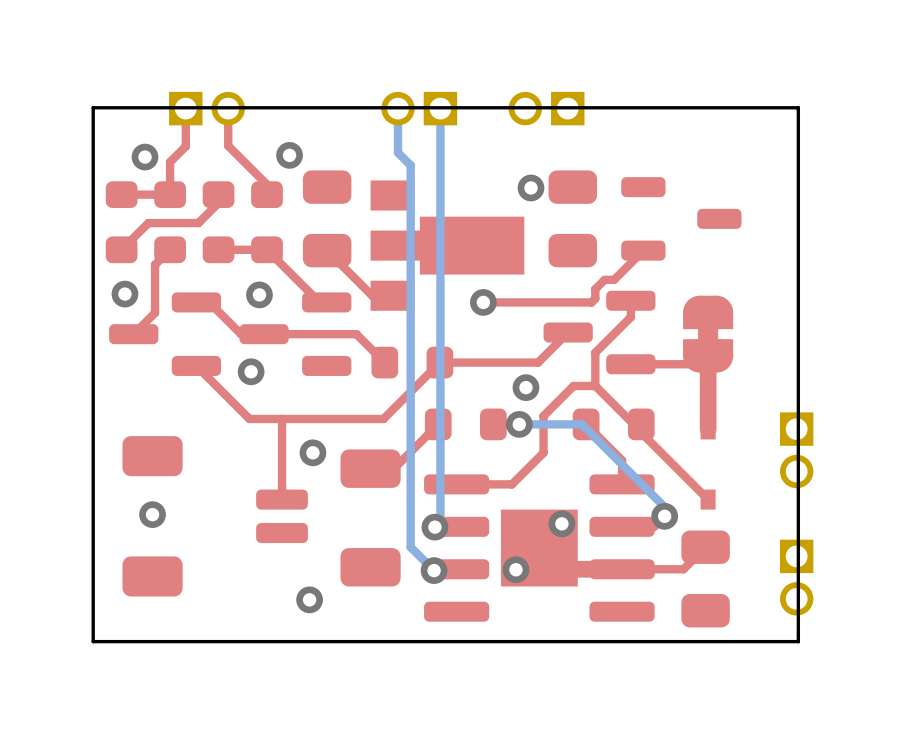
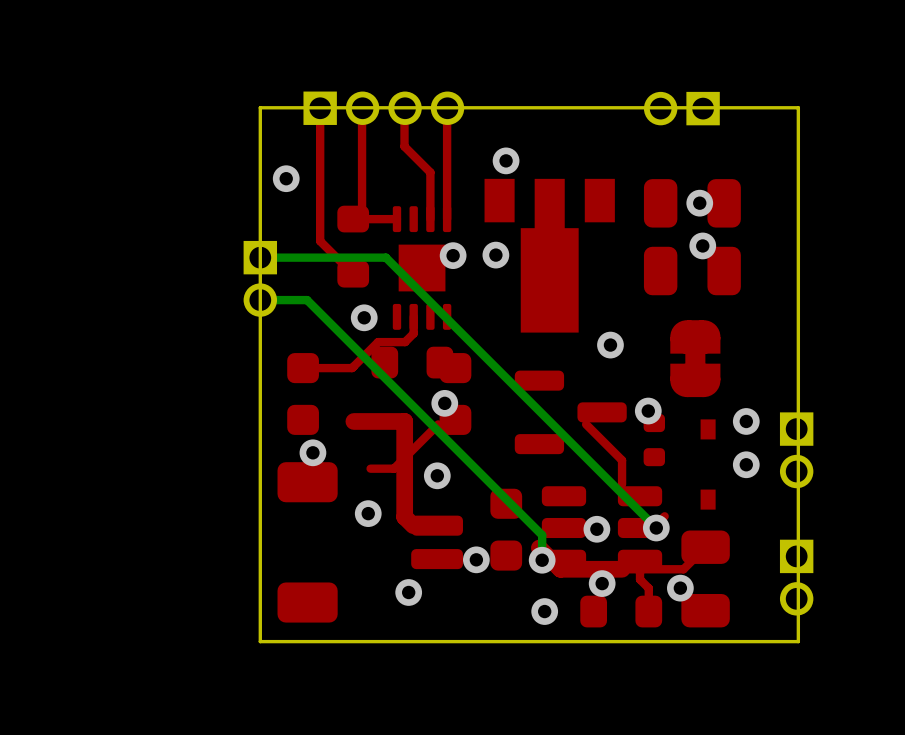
board edge: (260, 107) (93, 107) (93, 641) (260, 641) -> (260, 107) (260, 641)
top track: (185, 108) (185, 146) (170, 162) (170, 194) (121, 194) -> none
part: (207, 108) -> none
top track: (228, 108) (228, 145) (266, 184) (266, 194) -> none
part: none -> (383, 108)
bottom track: (397, 108) (397, 152) (410, 165) (410, 547) (434, 570) -> none
part: (419, 108) -> none
bottom track: (440, 108) (440, 521) (434, 527) -> none
part: (546, 108) -> none
part: none -> (681, 108)
top track: none -> (320, 111) (320, 241) (353, 274)
top track: none -> (362, 111) (362, 210)
top track: none -> (404, 111) (404, 146) (430, 172) (430, 219)
top track: none -> (447, 111) (447, 219)
via position: (289, 155) -> (286, 178)
via: (145, 157) -> none
part footprint: [621, 177, 742, 261] -> [643, 179, 741, 228]
via position: (530, 187) -> (506, 160)
top track: (218, 194) (218, 203) (198, 223) (148, 223) (121, 249) -> none
via: none -> (699, 203)
part: (327, 218) -> none
part rotation: 0° (572, 218) -> 90° clockwise (692, 271)
part position: (572, 218) -> (692, 271)
top track: none -> (396, 219) (353, 219)
part: (121, 222) -> none
part: (170, 222) -> none
part: (218, 222) -> none
part: (266, 222) -> none
part rotation: 0° (447, 245) -> 90° clockwise (549, 255)
part position: (447, 245) -> (549, 255)
via: none -> (702, 245)
part: none -> (353, 246)
top track: (170, 249) (155, 264) (155, 312) (133, 334) -> none
top track: (218, 249) (266, 249) (319, 302) (326, 302) -> none
top track: (327, 250) (372, 295) (392, 295) -> none
top track: (643, 250) (614, 279) (604, 279) (595, 289) (595, 298) (591, 302) (483, 302) -> none
via: none -> (453, 255)
via: none -> (495, 255)
bottom track: none -> (264, 257) (385, 257) (656, 528)
part: none -> (422, 268)
part: none -> (260, 278)
via: (124, 294) -> none
via: (259, 294) -> none
bottom track: none -> (264, 300) (307, 300) (542, 535) (542, 560)
top track: (630, 300) (630, 317) (595, 352) (595, 385) -> none
top track: (196, 302) (209, 302) (241, 334) (356, 334) (384, 362) -> none
via: (483, 302) -> none
top track: none -> (413, 316) (413, 333) (405, 342) (378, 342) (352, 368) (303, 368)
via: none -> (364, 317)
top track: (568, 332) (538, 362) (439, 362) (383, 418) (249, 418) (196, 365) -> none
part rotation: 0° (599, 332) -> 180° (570, 412)
part position: (599, 332) -> (570, 412)
part: (165, 334) -> none
part: (295, 334) -> none
part position: (708, 334) -> (695, 358)
via: none -> (610, 345)
top track: (630, 364) (699, 364) (708, 355) (708, 429) -> none
via: (251, 371) -> none
top track: (595, 385) (573, 385) (543, 416) (543, 452) (511, 484) (456, 484) -> none
top track: (595, 385) (633, 424) (641, 424) (641, 432) (708, 499) -> none
via: (525, 387) -> none
part: none -> (303, 393)
via: none -> (444, 403)
part footprint: [424, 408, 507, 441] -> [439, 353, 472, 435]
via: none -> (648, 411)
top track: (282, 419) (282, 499) -> none
top track: none -> (353, 421) (404, 421) (404, 516) (413, 525) (437, 525)
via: none -> (746, 421)
bottom track: (519, 424) (581, 424) (664, 507) (664, 516) -> none
via: (519, 424) -> none
part: (613, 424) -> none
part: none -> (654, 440)
part footprint: [340, 449, 401, 587] -> [277, 462, 463, 623]
via: none -> (746, 464)
via: none -> (437, 475)
via: none -> (368, 513)
via: (152, 514) -> none
part: (215, 516) -> none
via position: (664, 516) -> (656, 528)
via: (561, 523) -> none
via: (434, 527) -> none
part: none -> (602, 528)
part: none -> (506, 529)
via: none -> (596, 529)
part: (539, 548) -> none
via: none -> (476, 559)
top track: none -> (640, 559) (640, 579) (648, 588) (648, 611)
via position: (515, 569) -> (542, 560)
via: (434, 570) -> none
via: none -> (602, 583)
via: none -> (680, 588)
via: none -> (408, 592)
via: (309, 599) -> none
via: none -> (544, 611)
part: none -> (621, 611)

